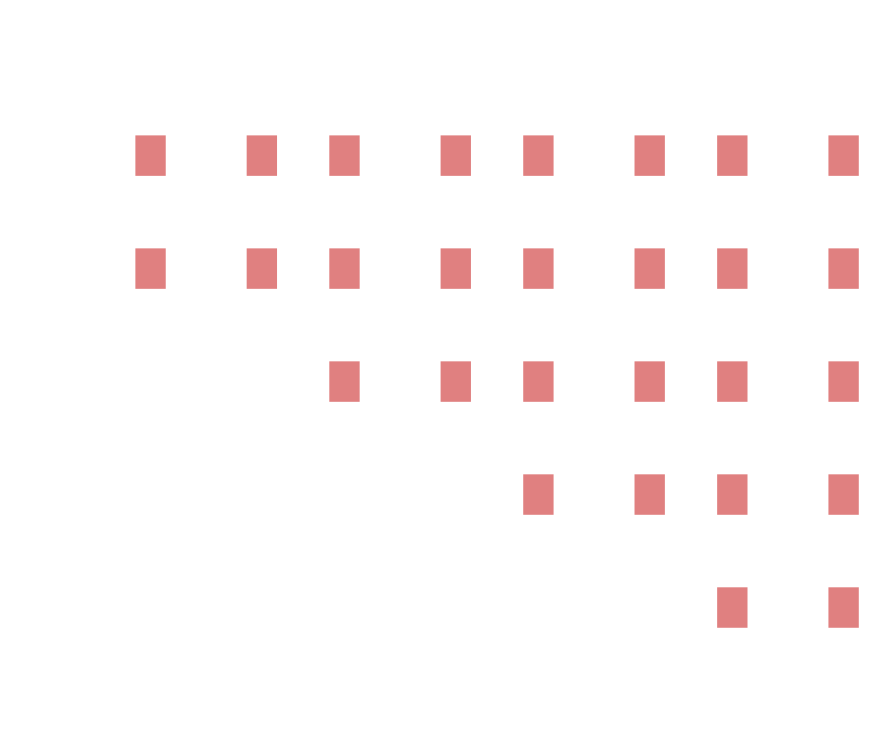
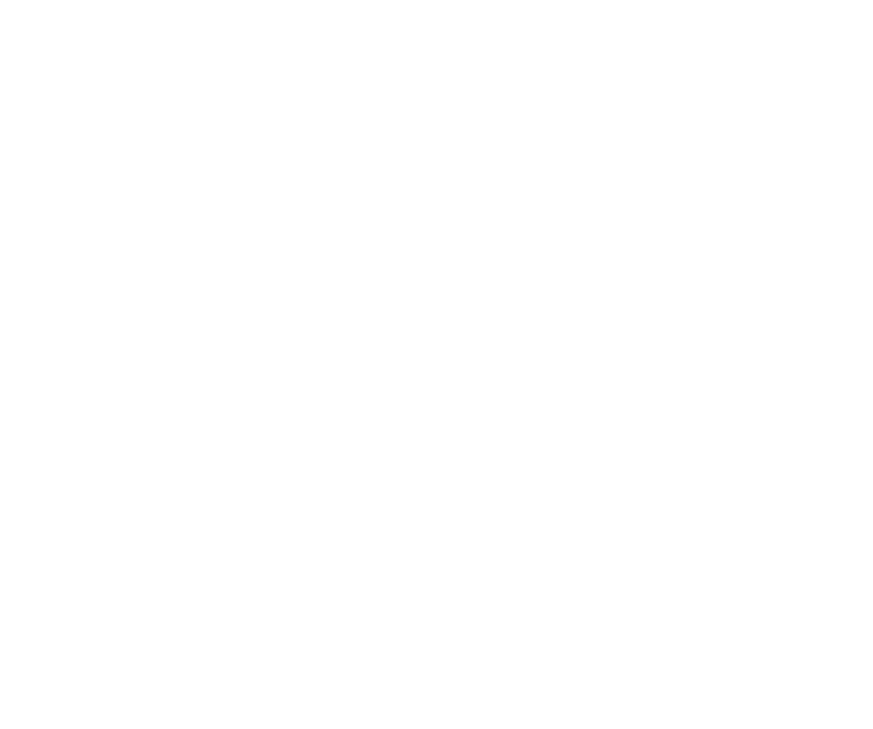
part: (206, 155) -> none
part: (400, 155) -> none
part: (594, 155) -> none
part: (787, 155) -> none
part: (206, 268) -> none
part: (400, 268) -> none
part: (594, 268) -> none
part: (787, 268) -> none
part: (400, 381) -> none
part: (594, 381) -> none
part: (787, 381) -> none
part: (594, 494) -> none
part: (787, 494) -> none
part: (787, 607) -> none

